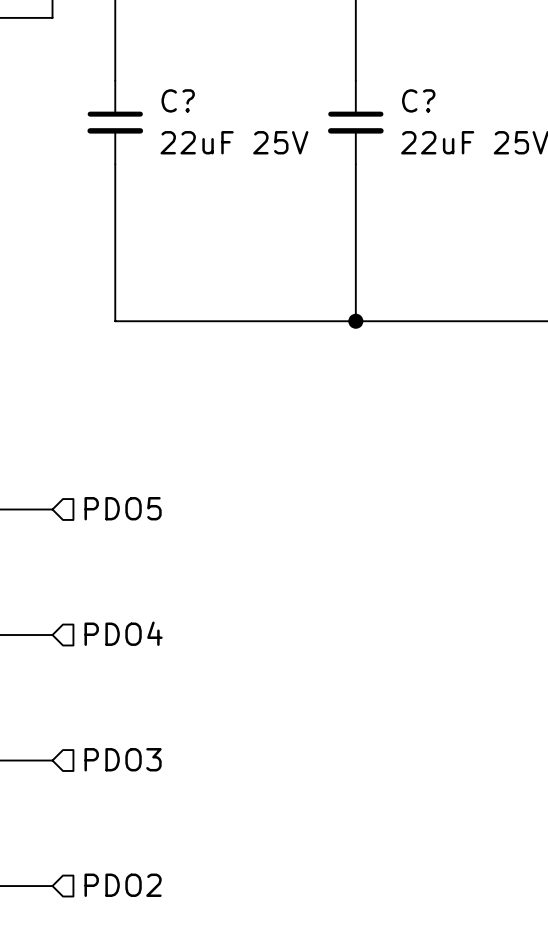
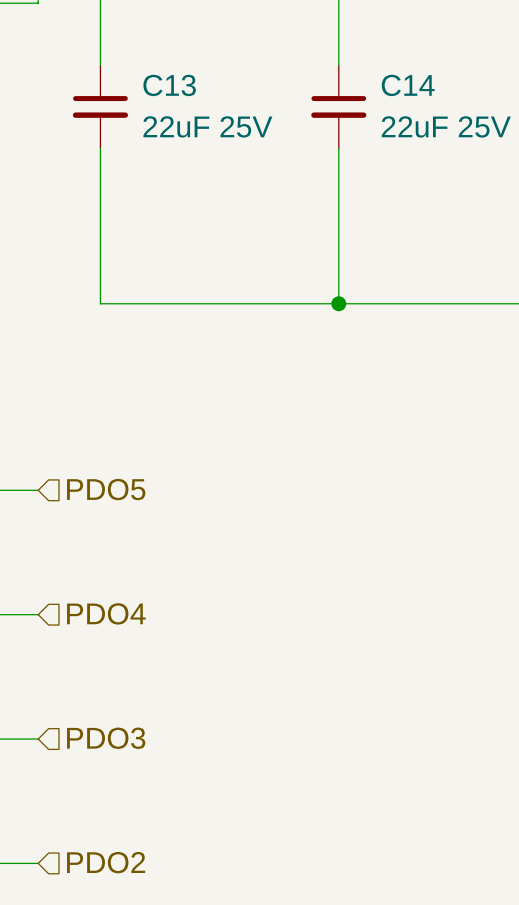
C? name: C? (178, 100) -> C13 (169, 85)
C? name: C? (418, 100) -> C14 (408, 85)

